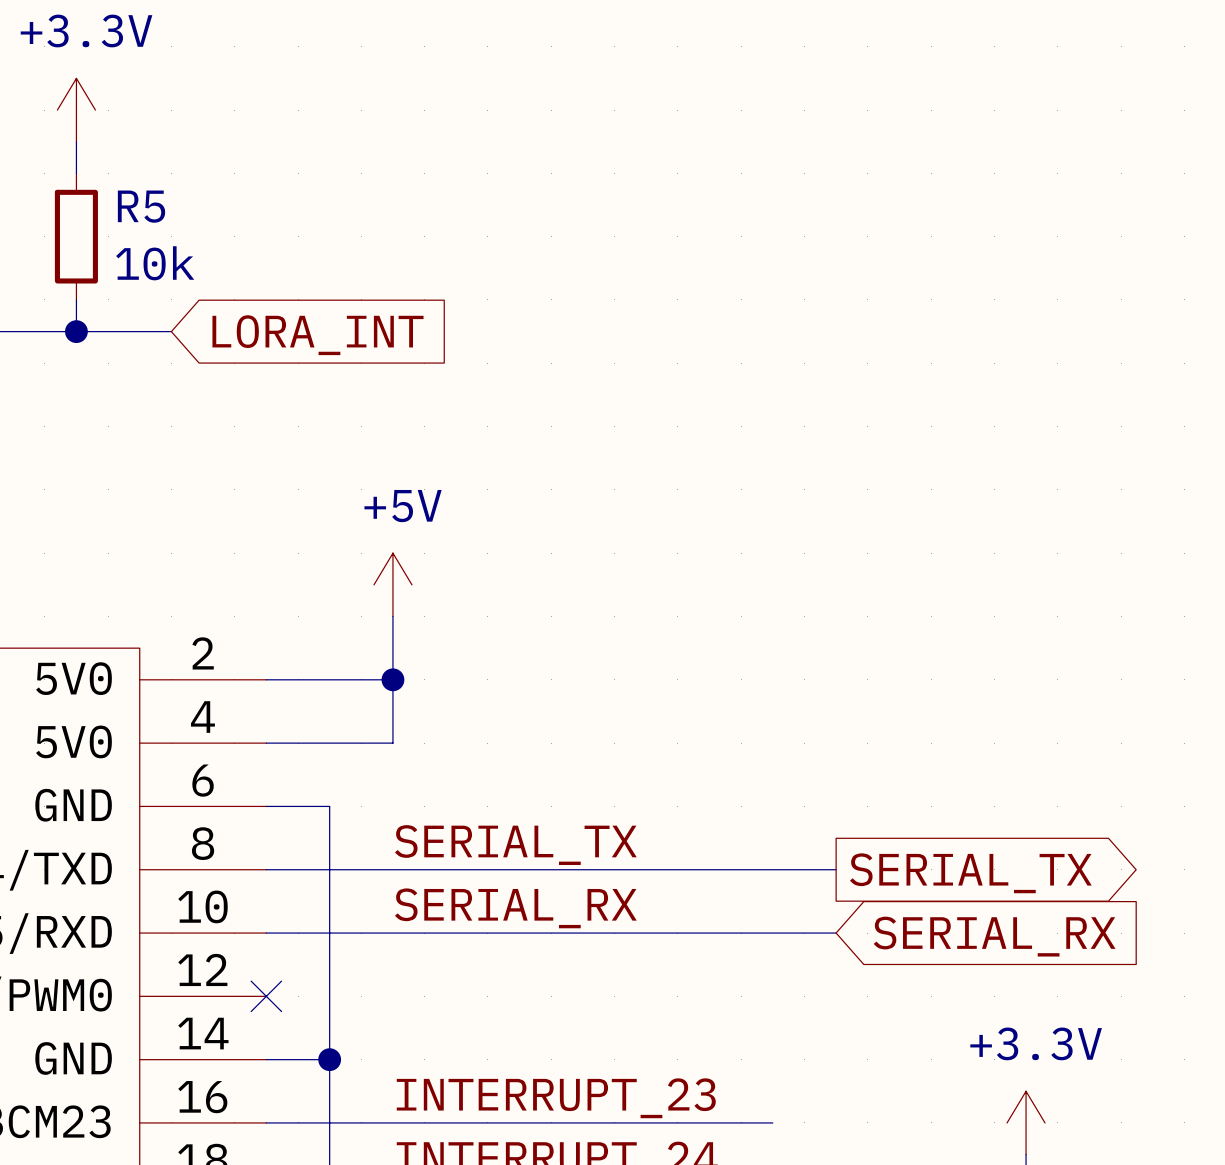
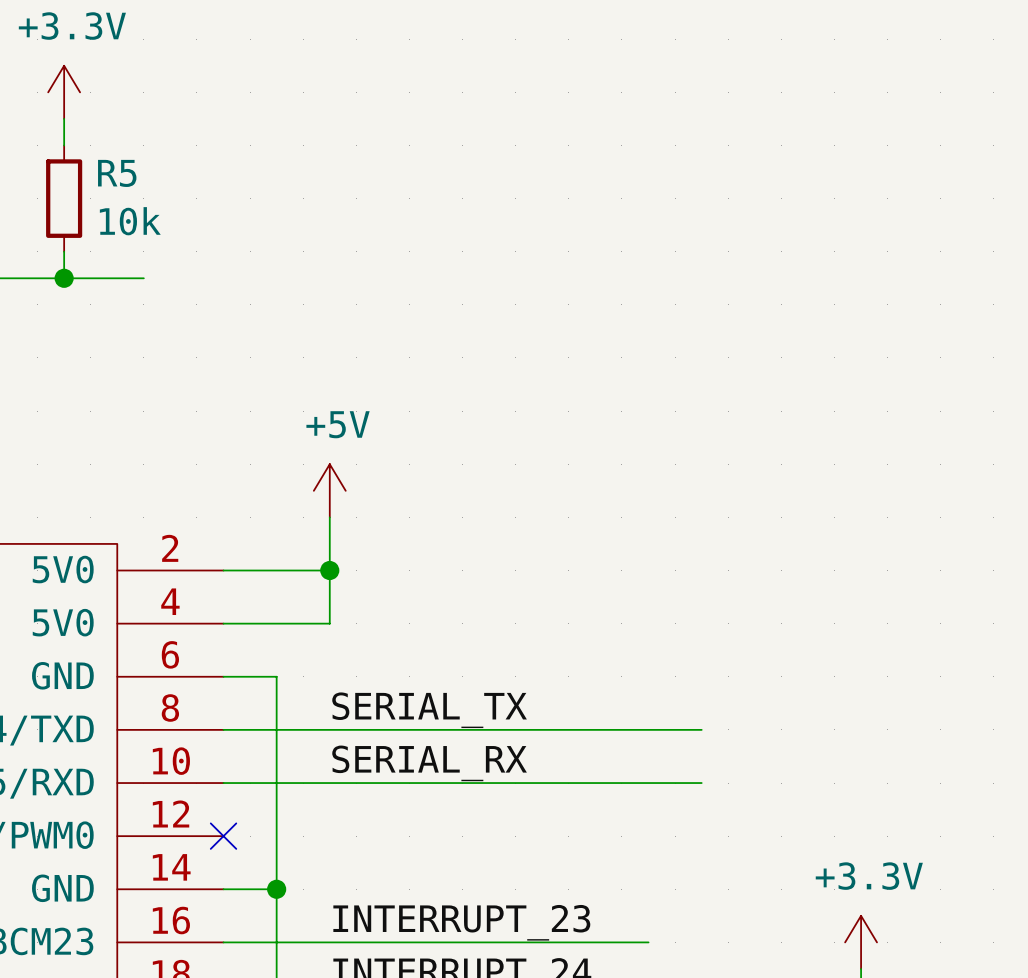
global label: LORA_INT (318, 335) -> none
global label: SERIAL_TX (970, 873) -> none
global label: SERIAL_RX (994, 936) -> none

